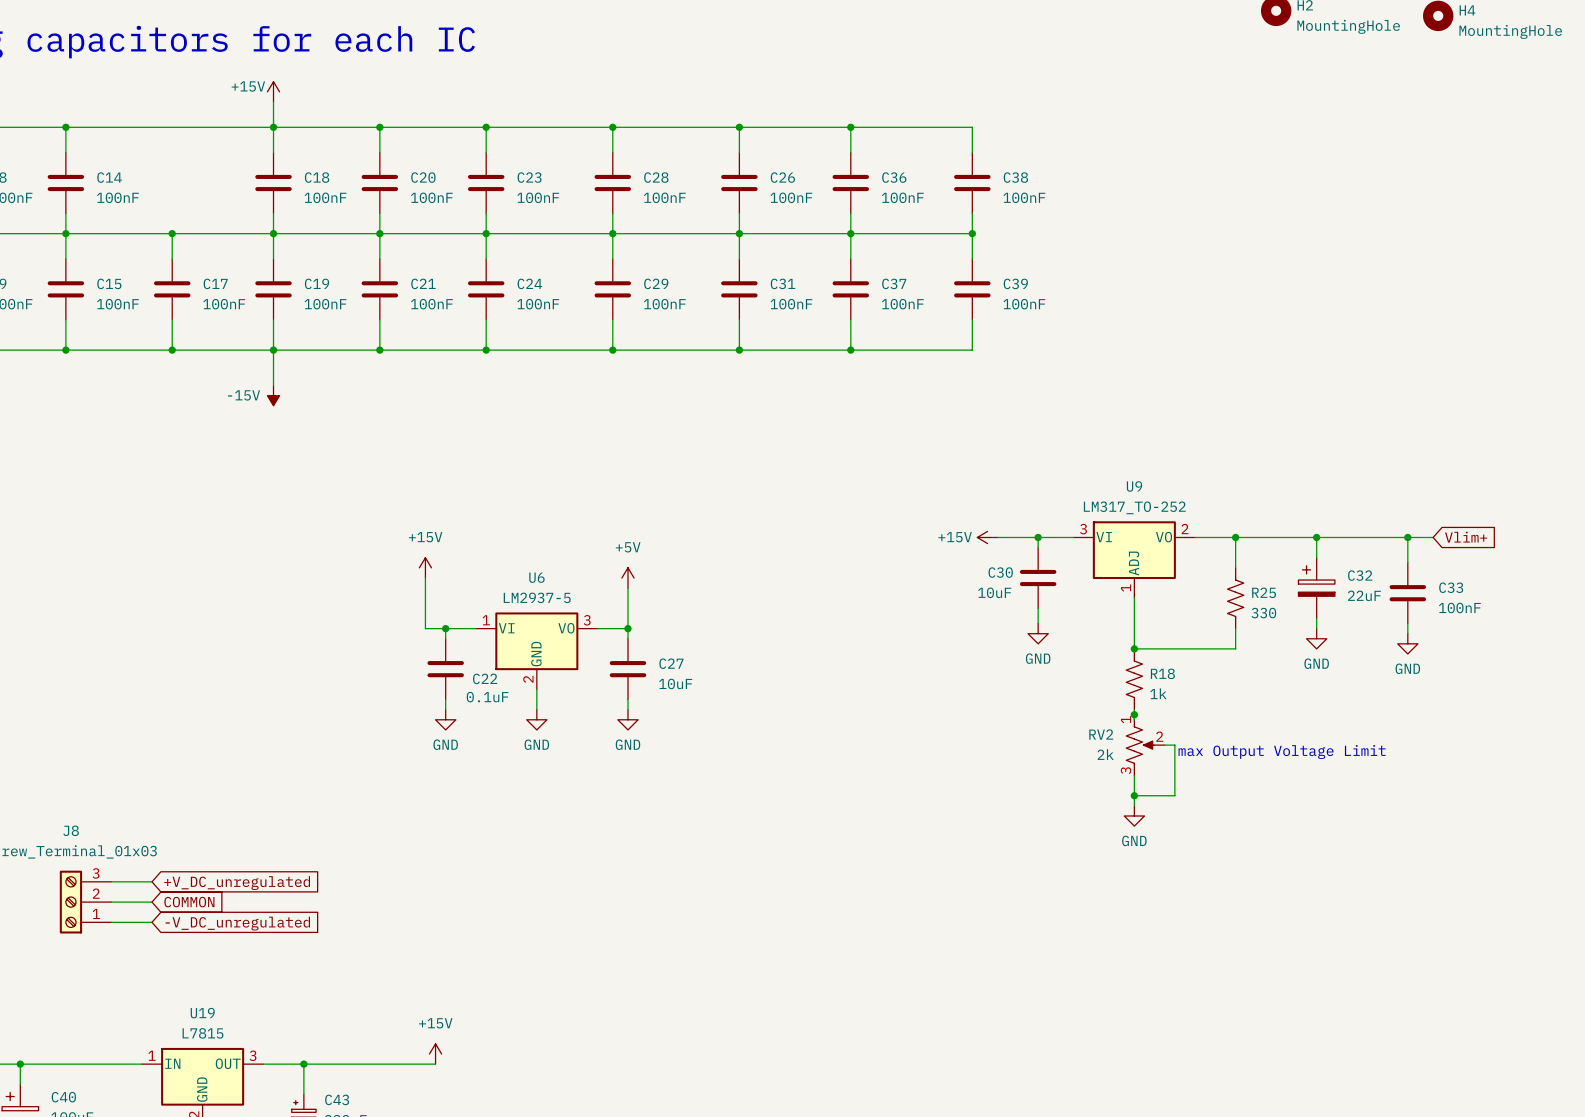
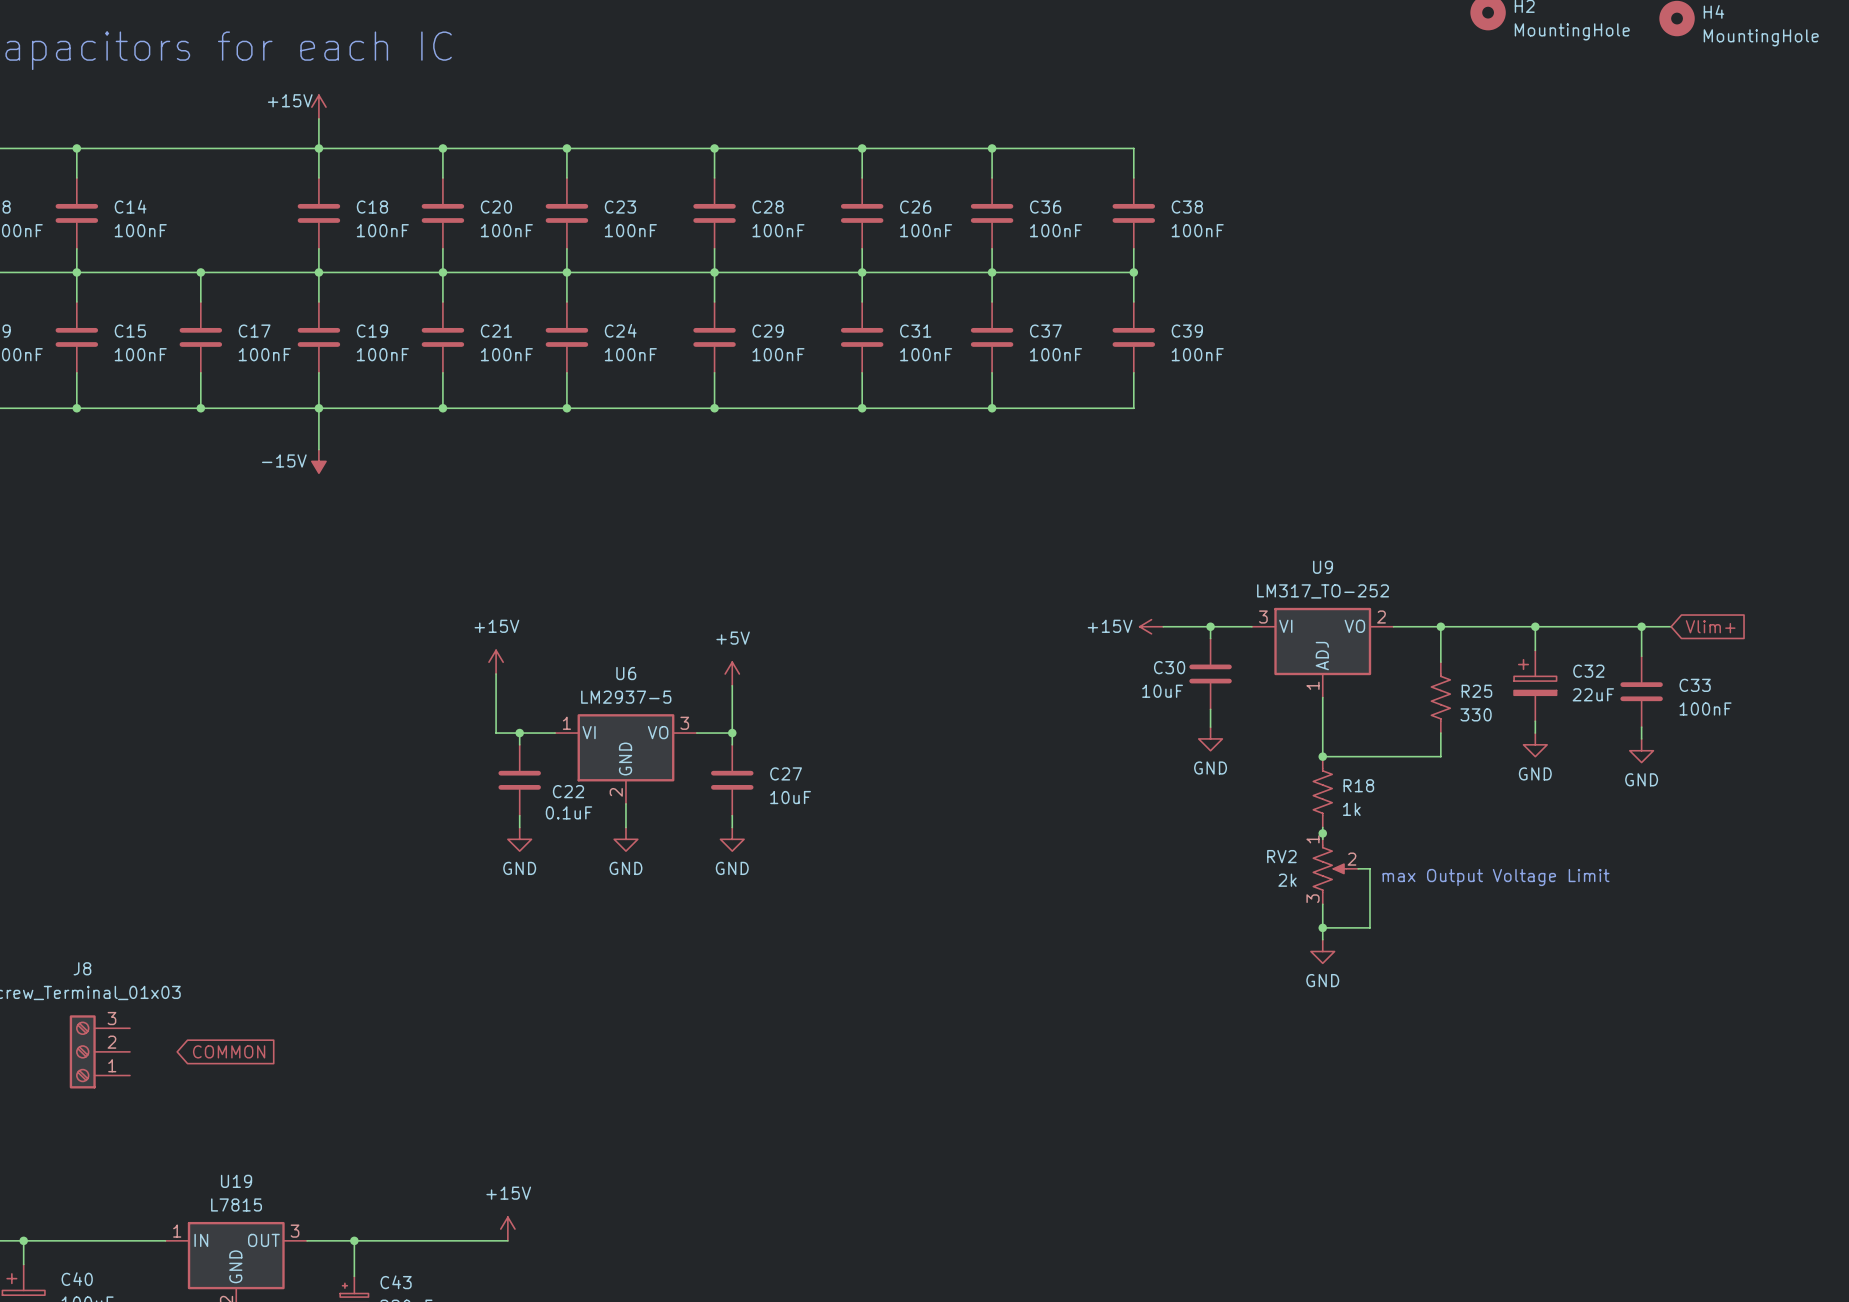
wire: (111, 881) (151, 881) -> none
global label: +V_DC_unregulated (237, 883) -> none
wire: (111, 902) (151, 902) -> none
wire: (111, 922) (151, 922) -> none
global label: -V_DC_unregulated (237, 923) -> none

